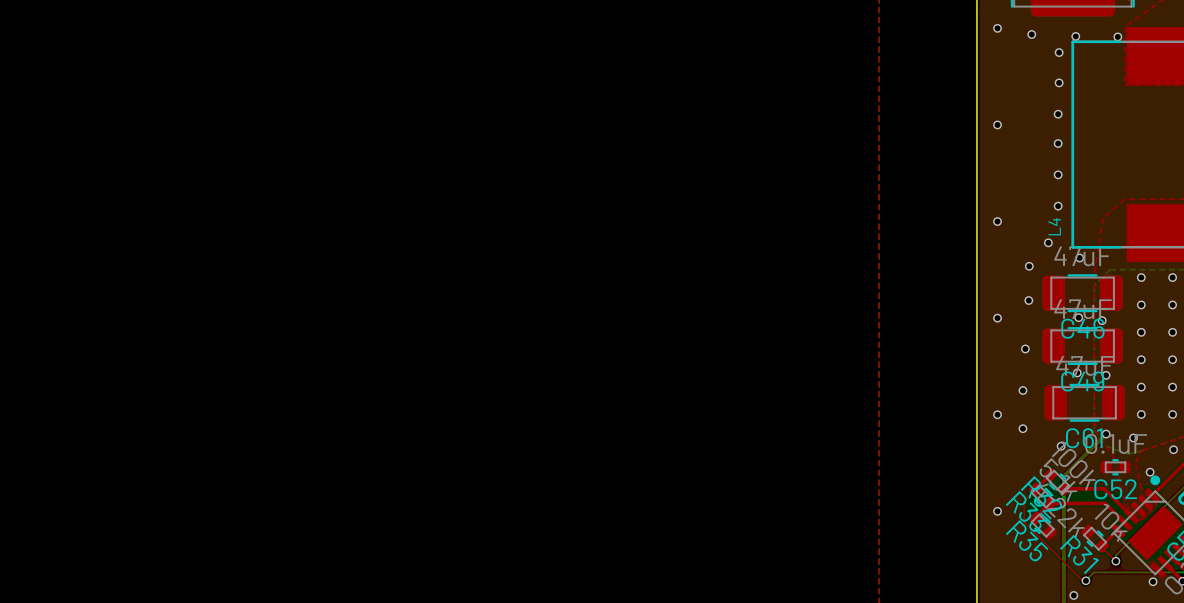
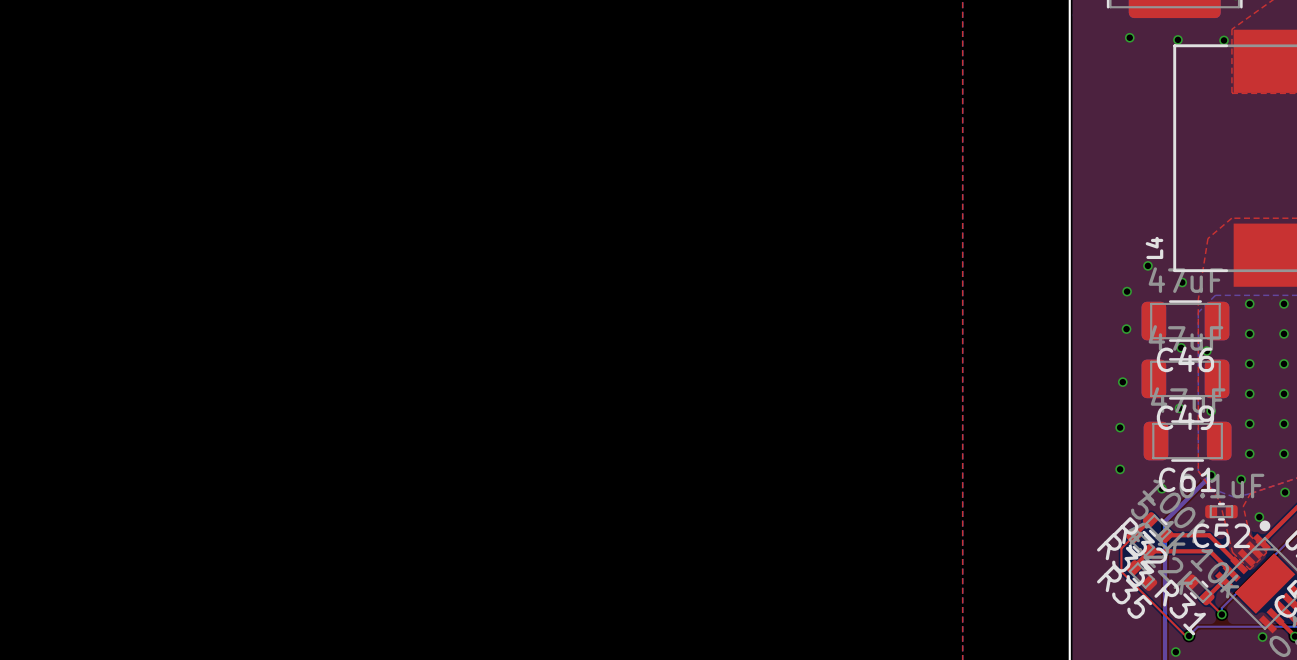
via: (997, 28) -> none
via: (1059, 52) -> none
via: (1059, 82) -> none
via: (1058, 114) -> none
via: (997, 124) -> none
via: (1058, 143) -> none
via: (1058, 174) -> none
via: (1058, 206) -> none
via: (997, 221) -> none
via: (997, 318) -> none
via: (997, 414) -> none
via: (997, 511) -> none

